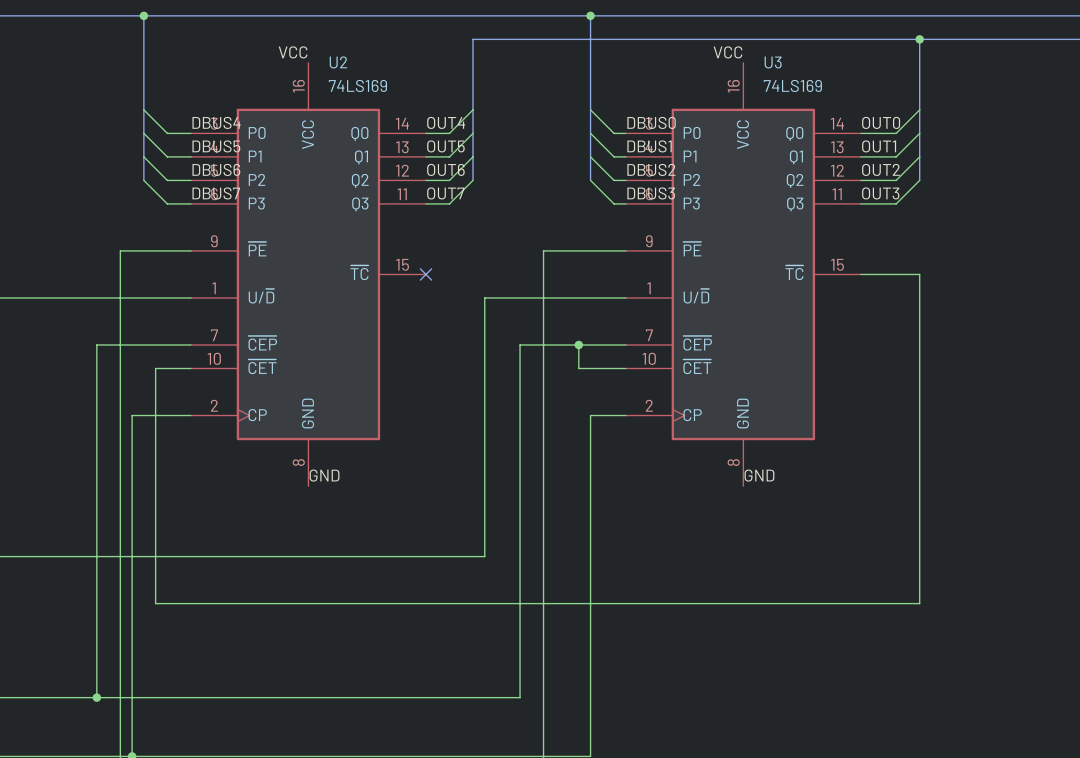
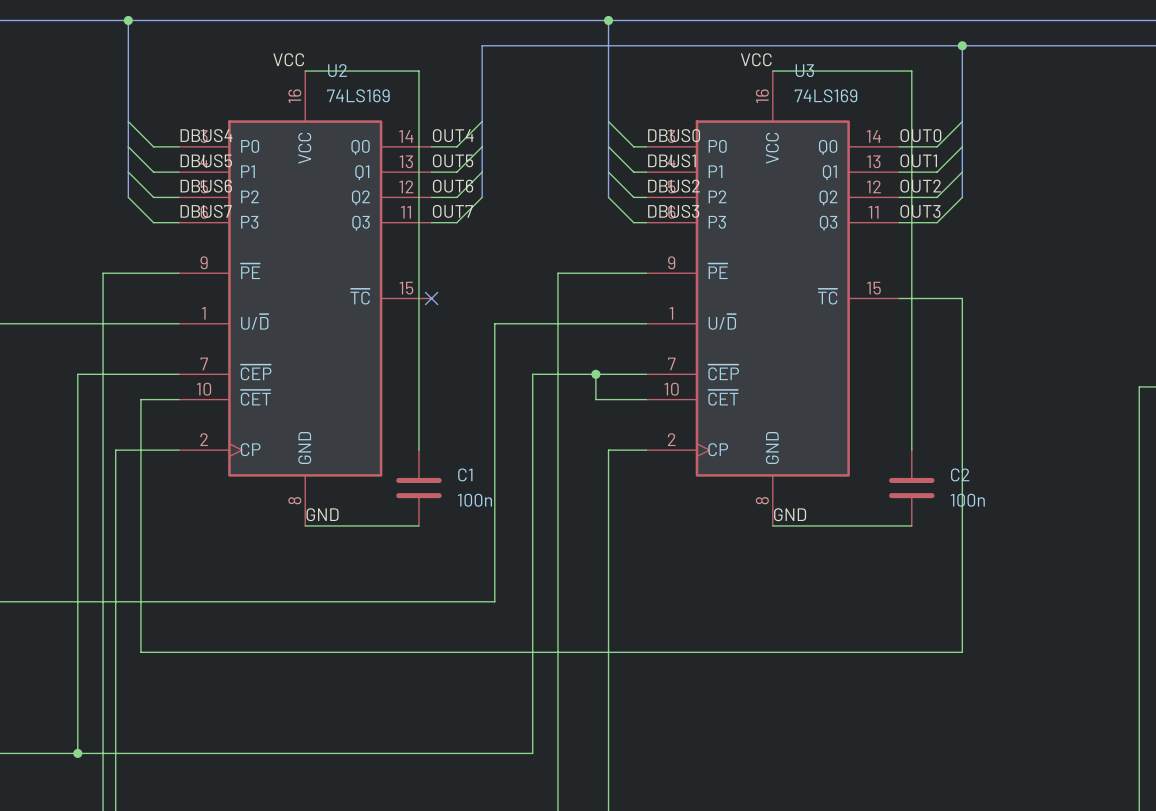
wire: none -> (305, 71) (418, 71) (418, 450)
wire: none -> (772, 71) (911, 71) (911, 450)
C1: none -> 100n (418, 488)
C2: none -> 100n (911, 488)
wire: none -> (305, 525) (418, 525)
wire: none -> (772, 525) (911, 525)

